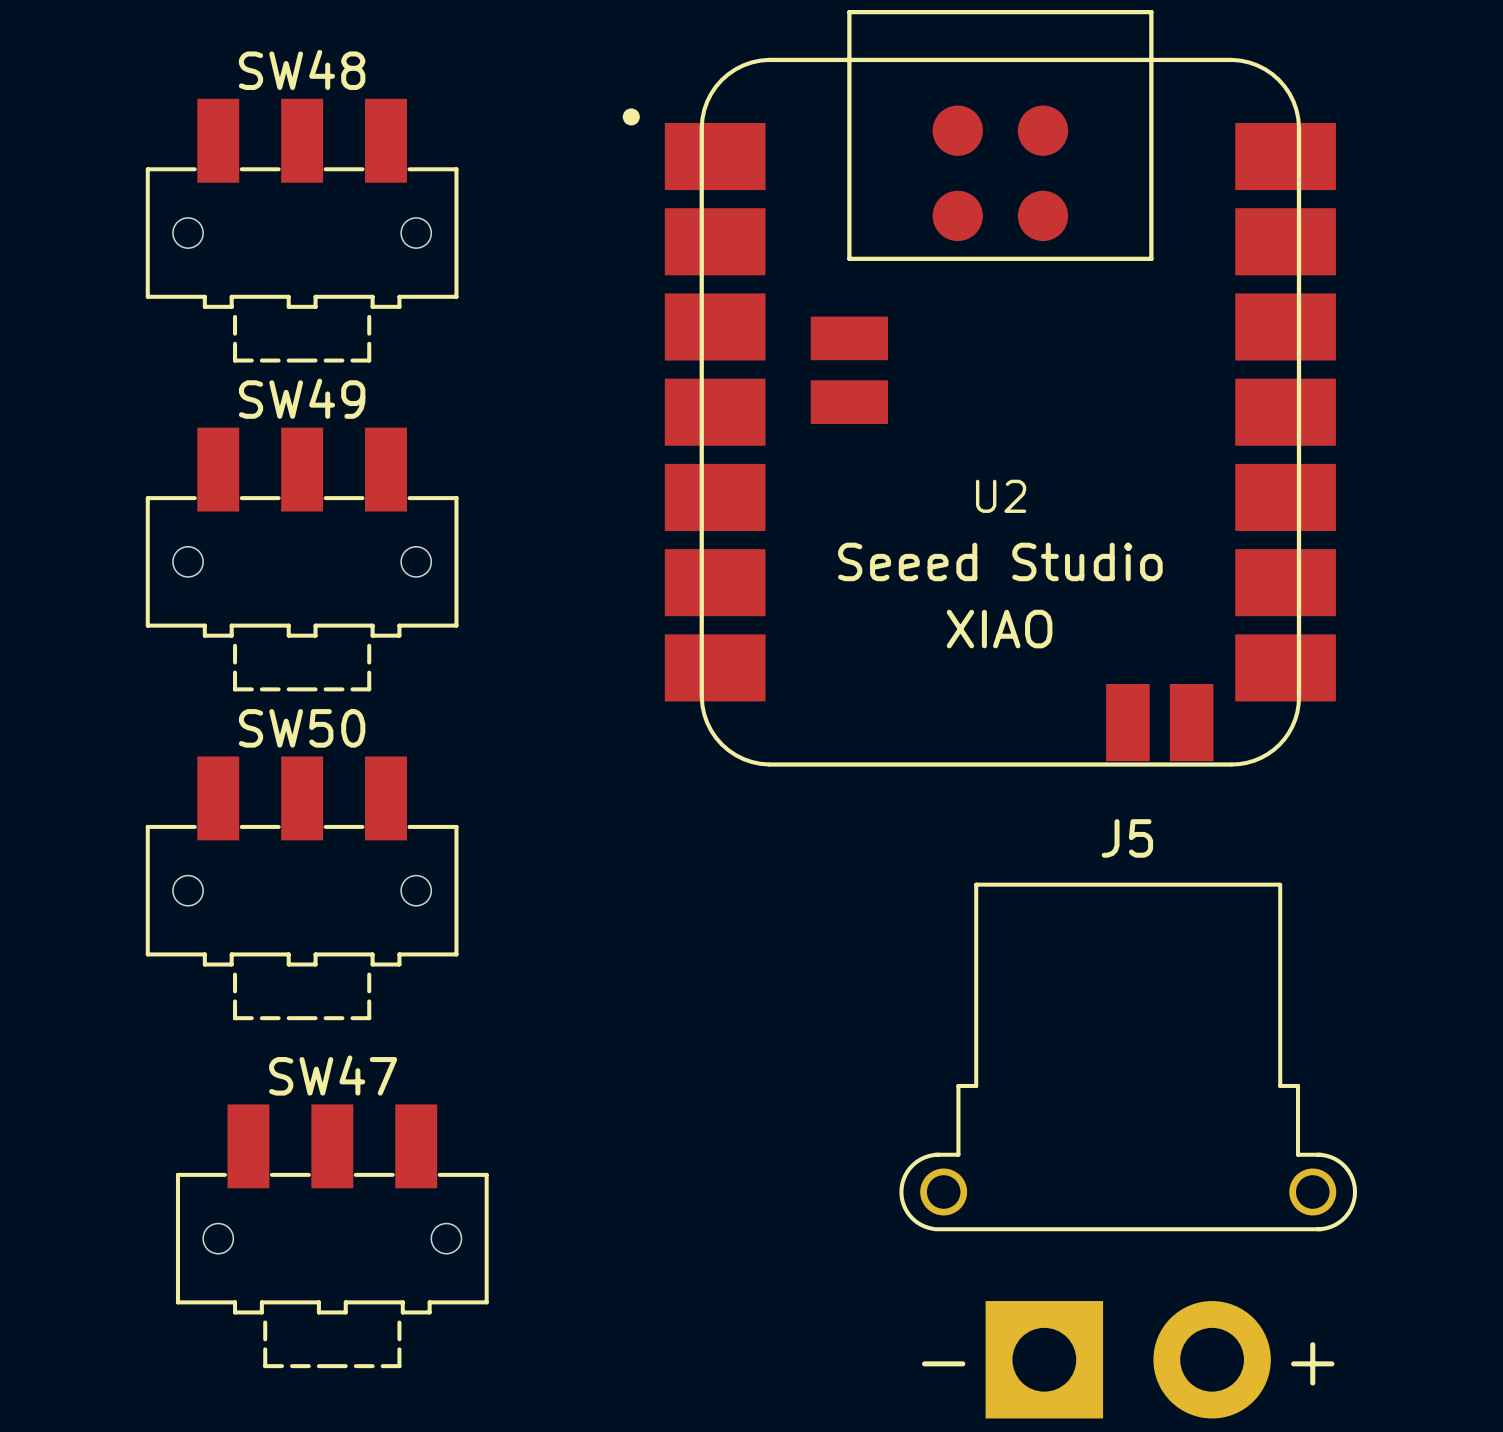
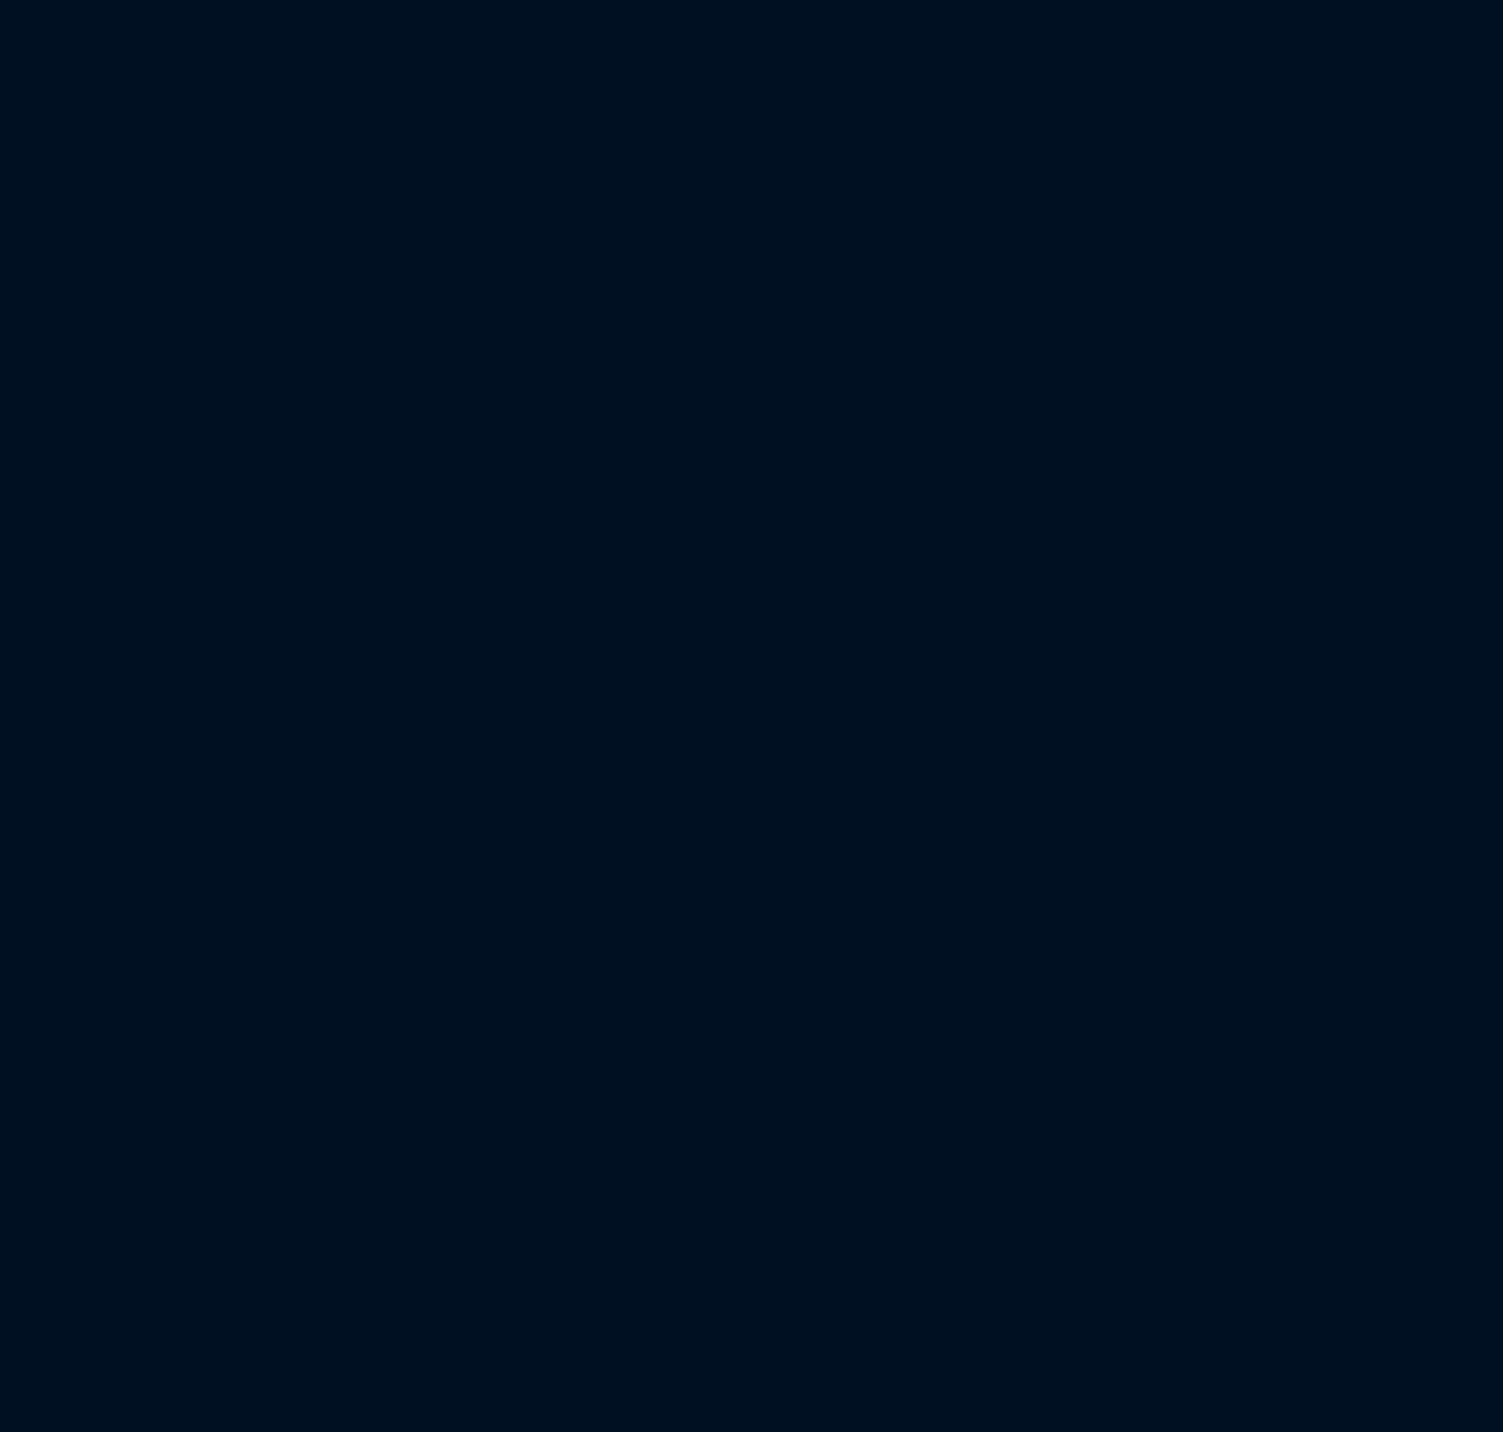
SW48: (302, 230) -> none
U2: (979, 388) -> none
SW49: (302, 559) -> none
SW50: (302, 888) -> none
J5: (1128, 1150) -> none
SW47: (332, 1236) -> none

